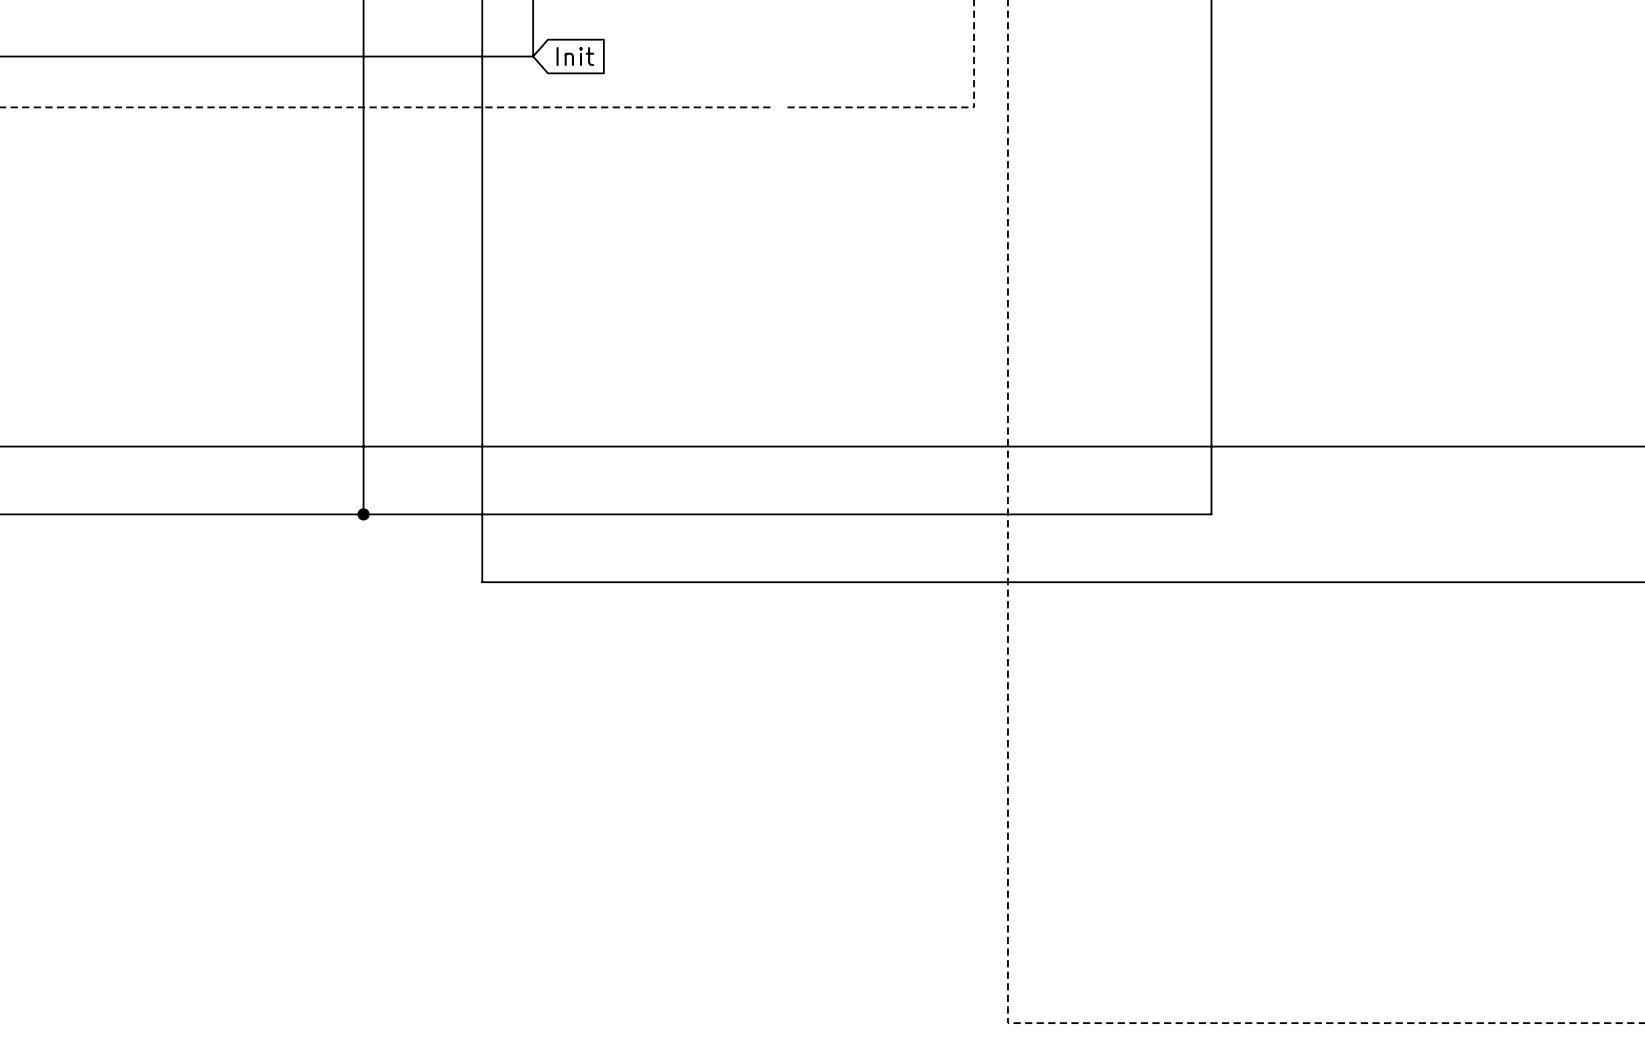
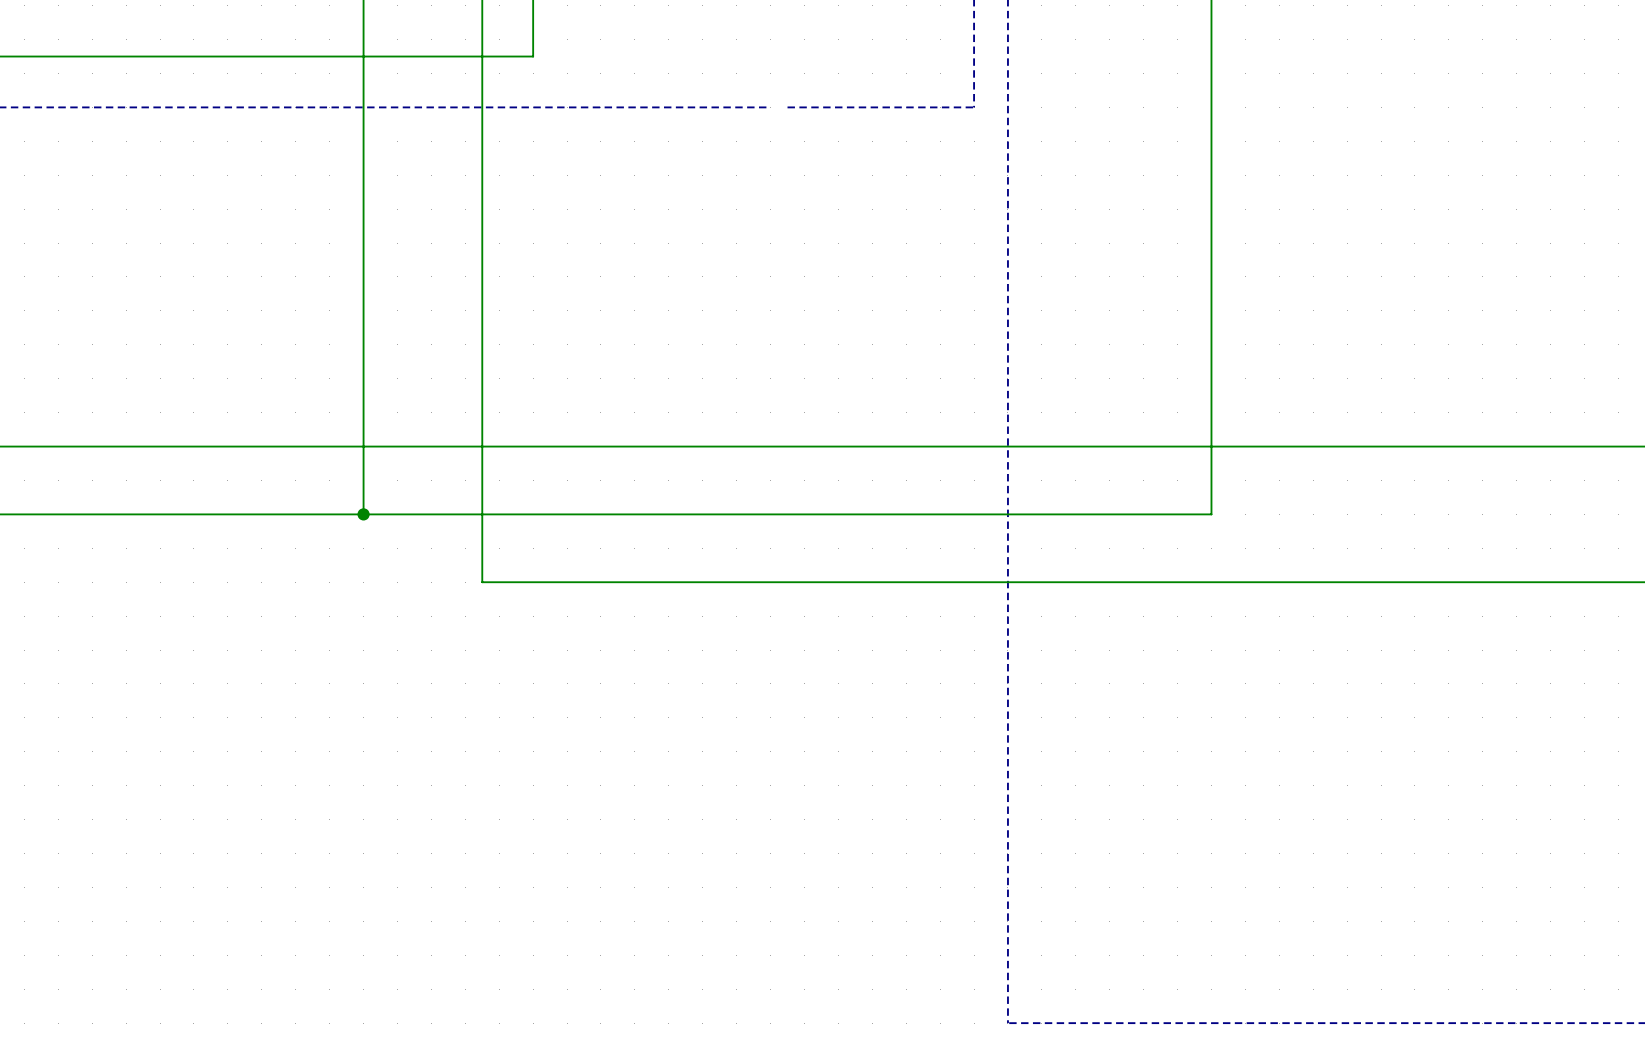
global label: Init (575, 56) -> none

